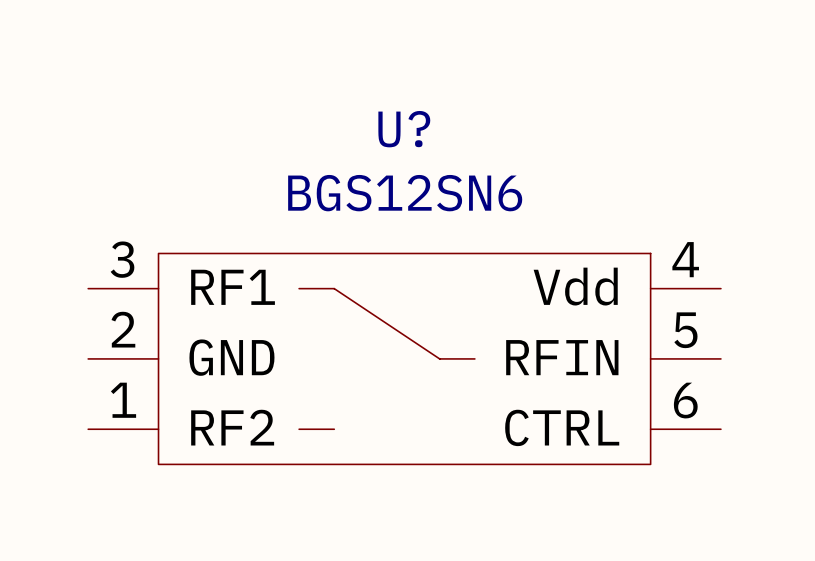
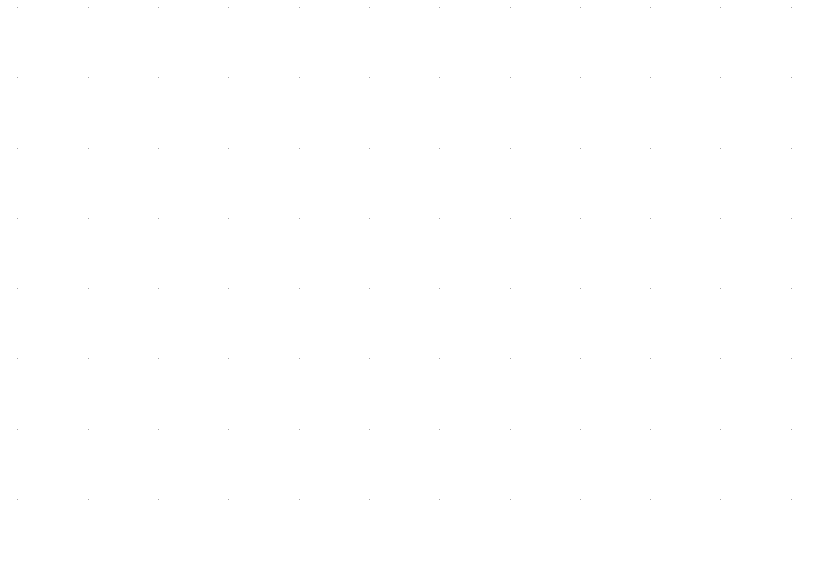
U?: BGS12SN6 (404, 358) -> none

